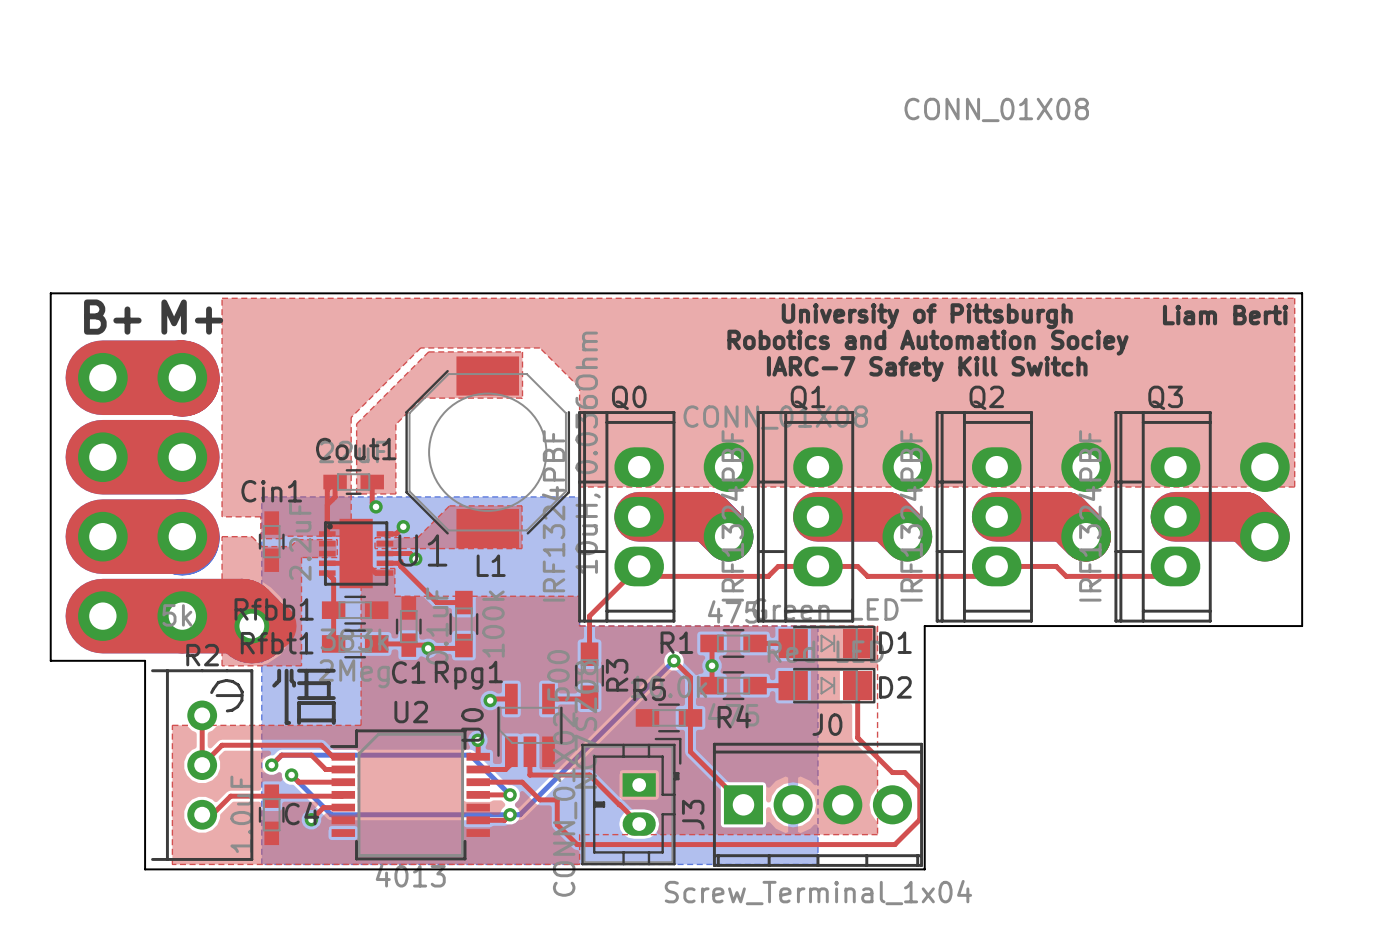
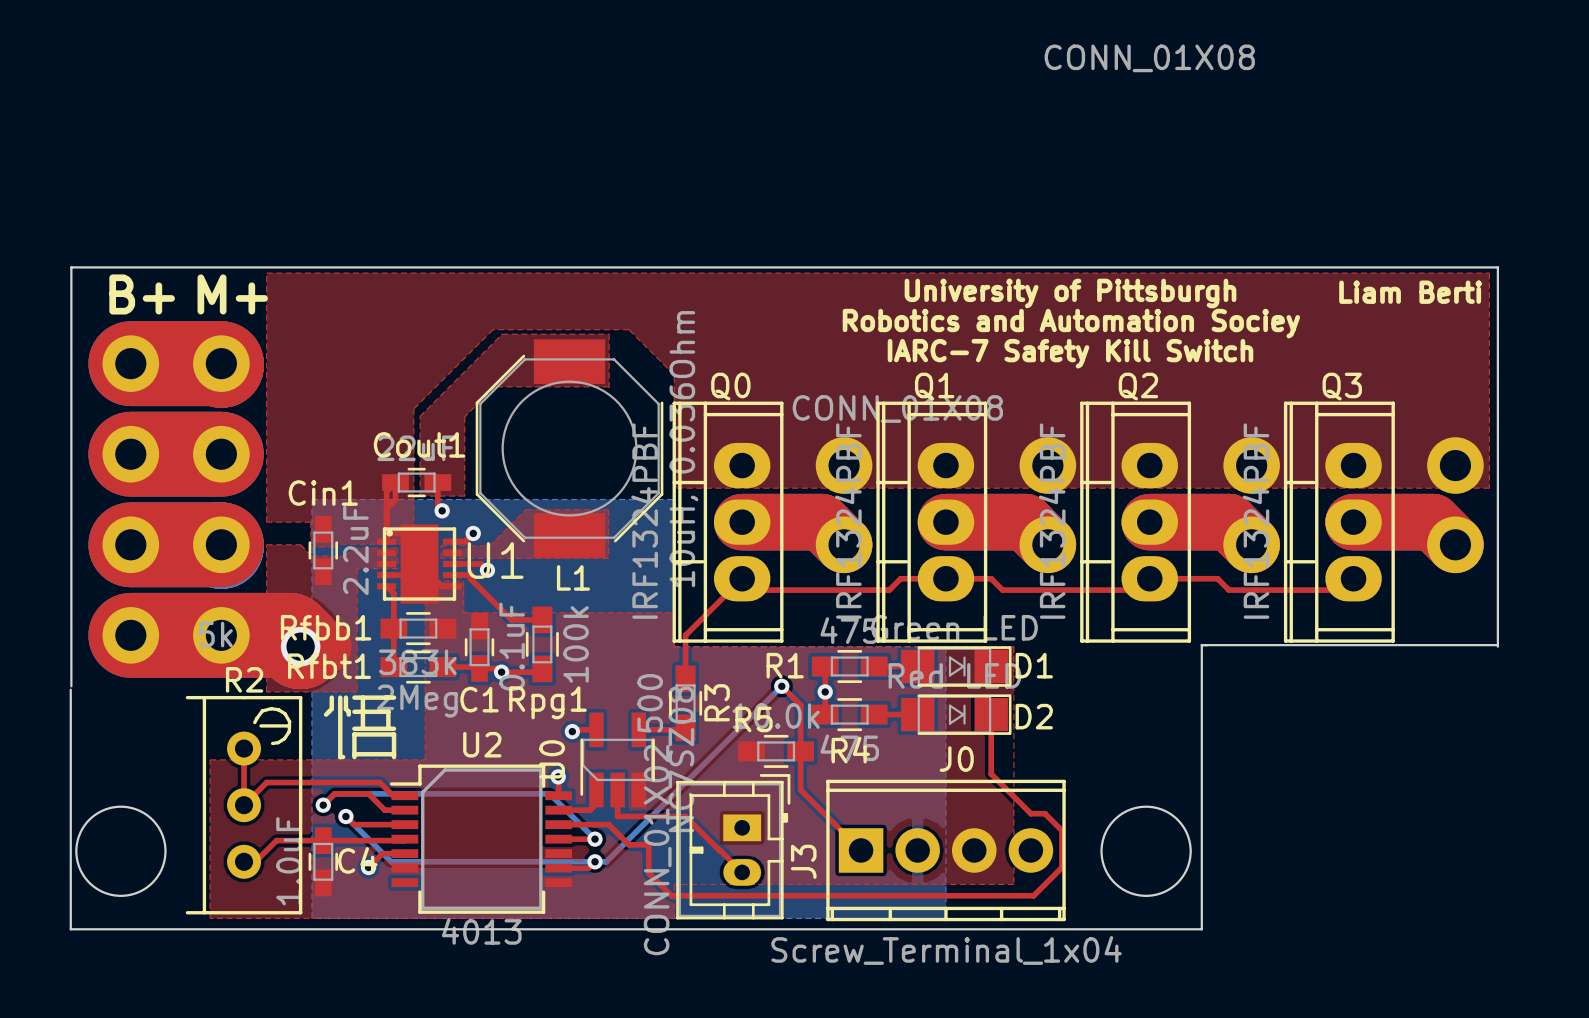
board edge: none -> (1497, 645) (1201, 645) (1201, 929) (70, 929) (70, 689)
board edge: (1302, 626) (924, 626) (924, 869) (145, 869) (145, 660) (50, 660) -> none
round board edge: none -> [75, 805, 167, 897]
round board edge: none -> [1100, 805, 1192, 897]

